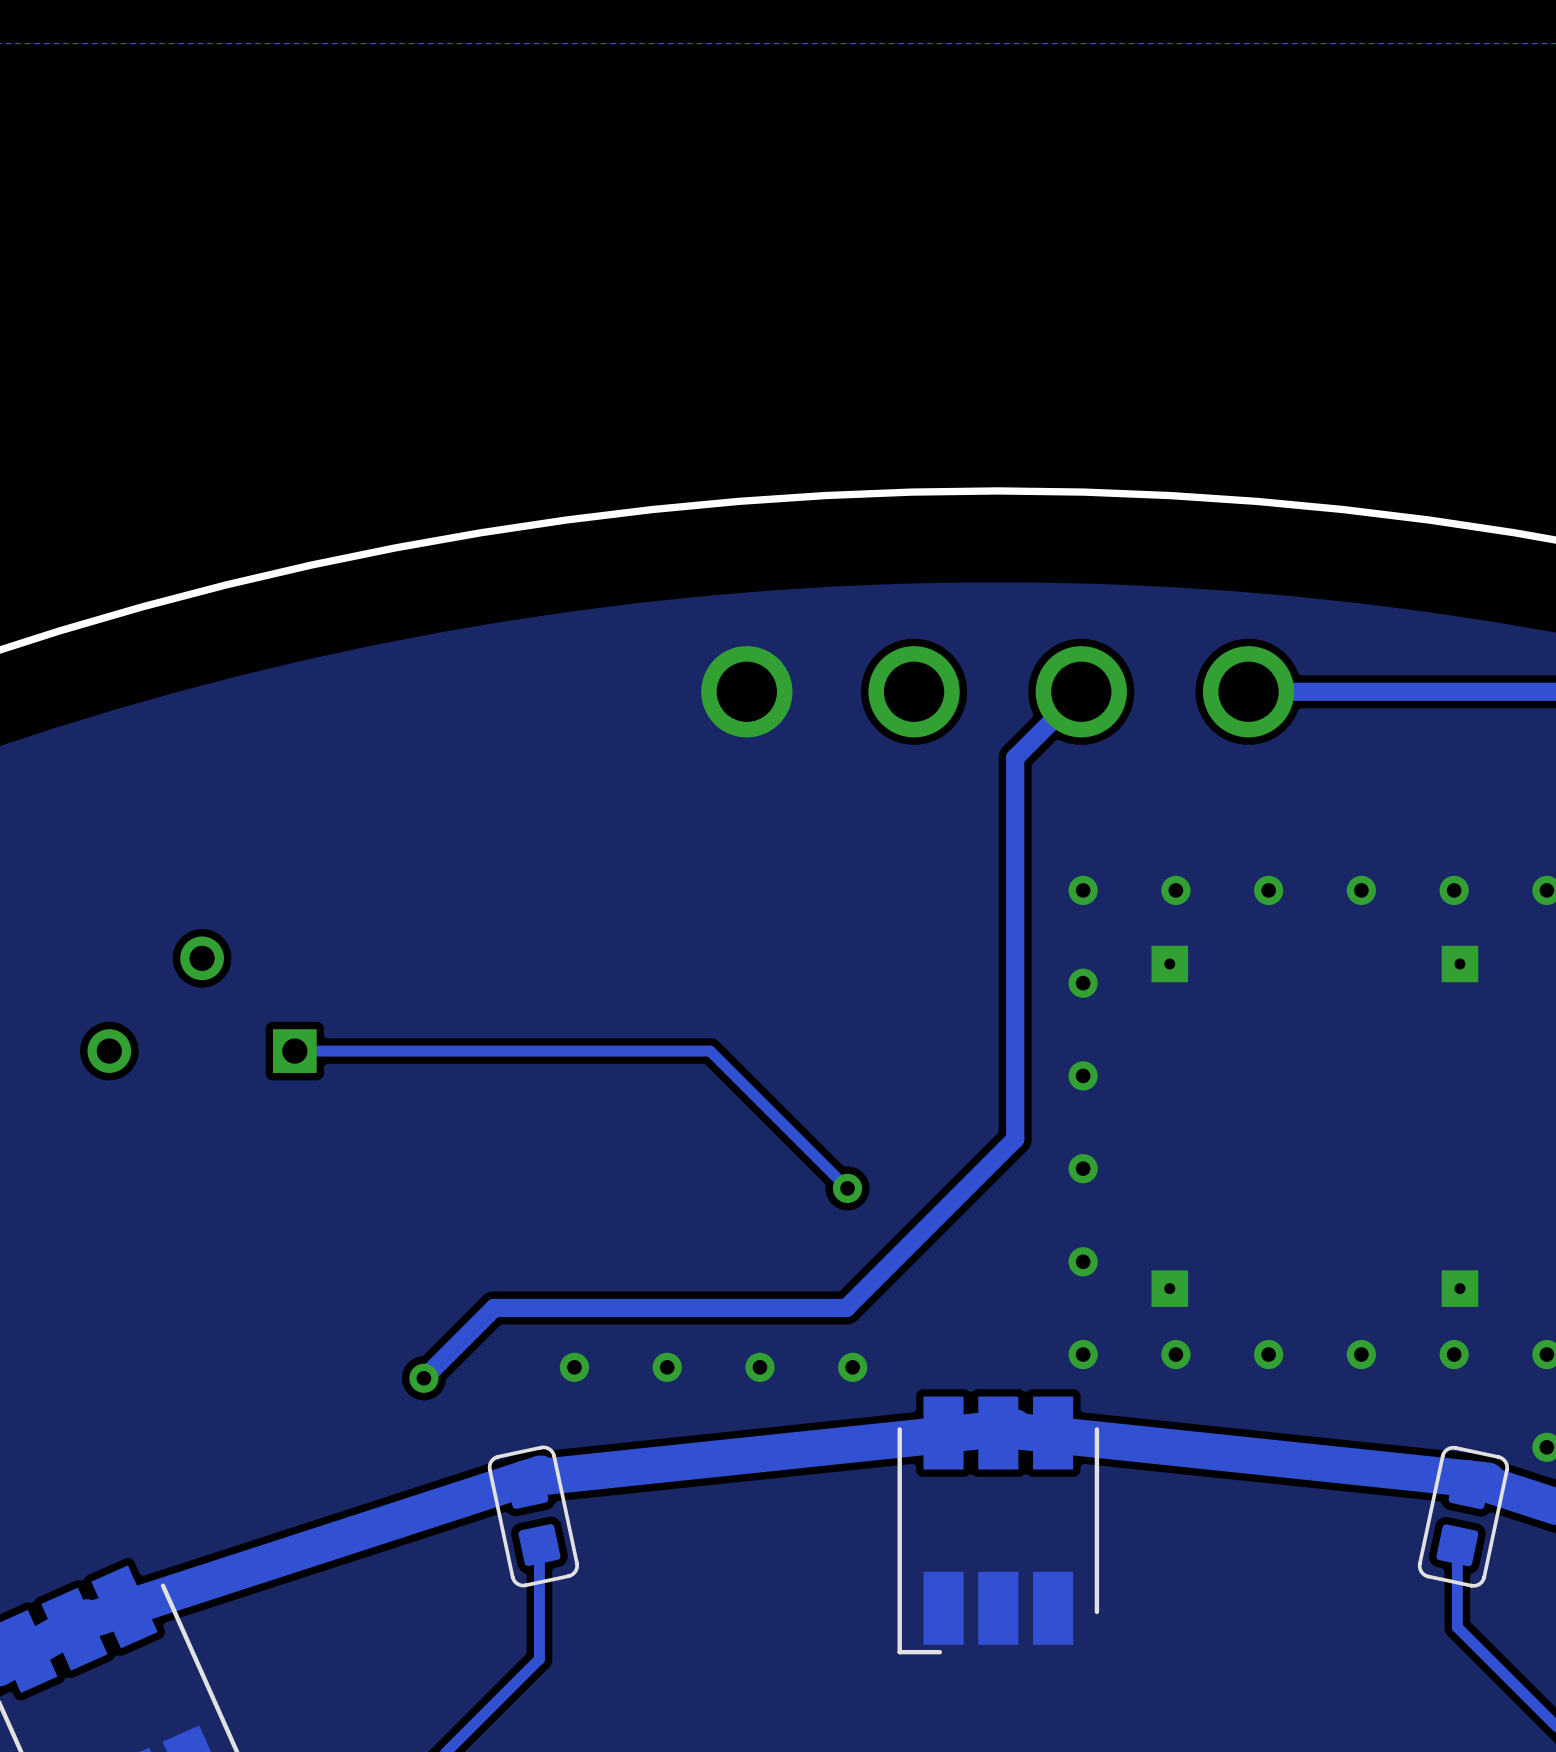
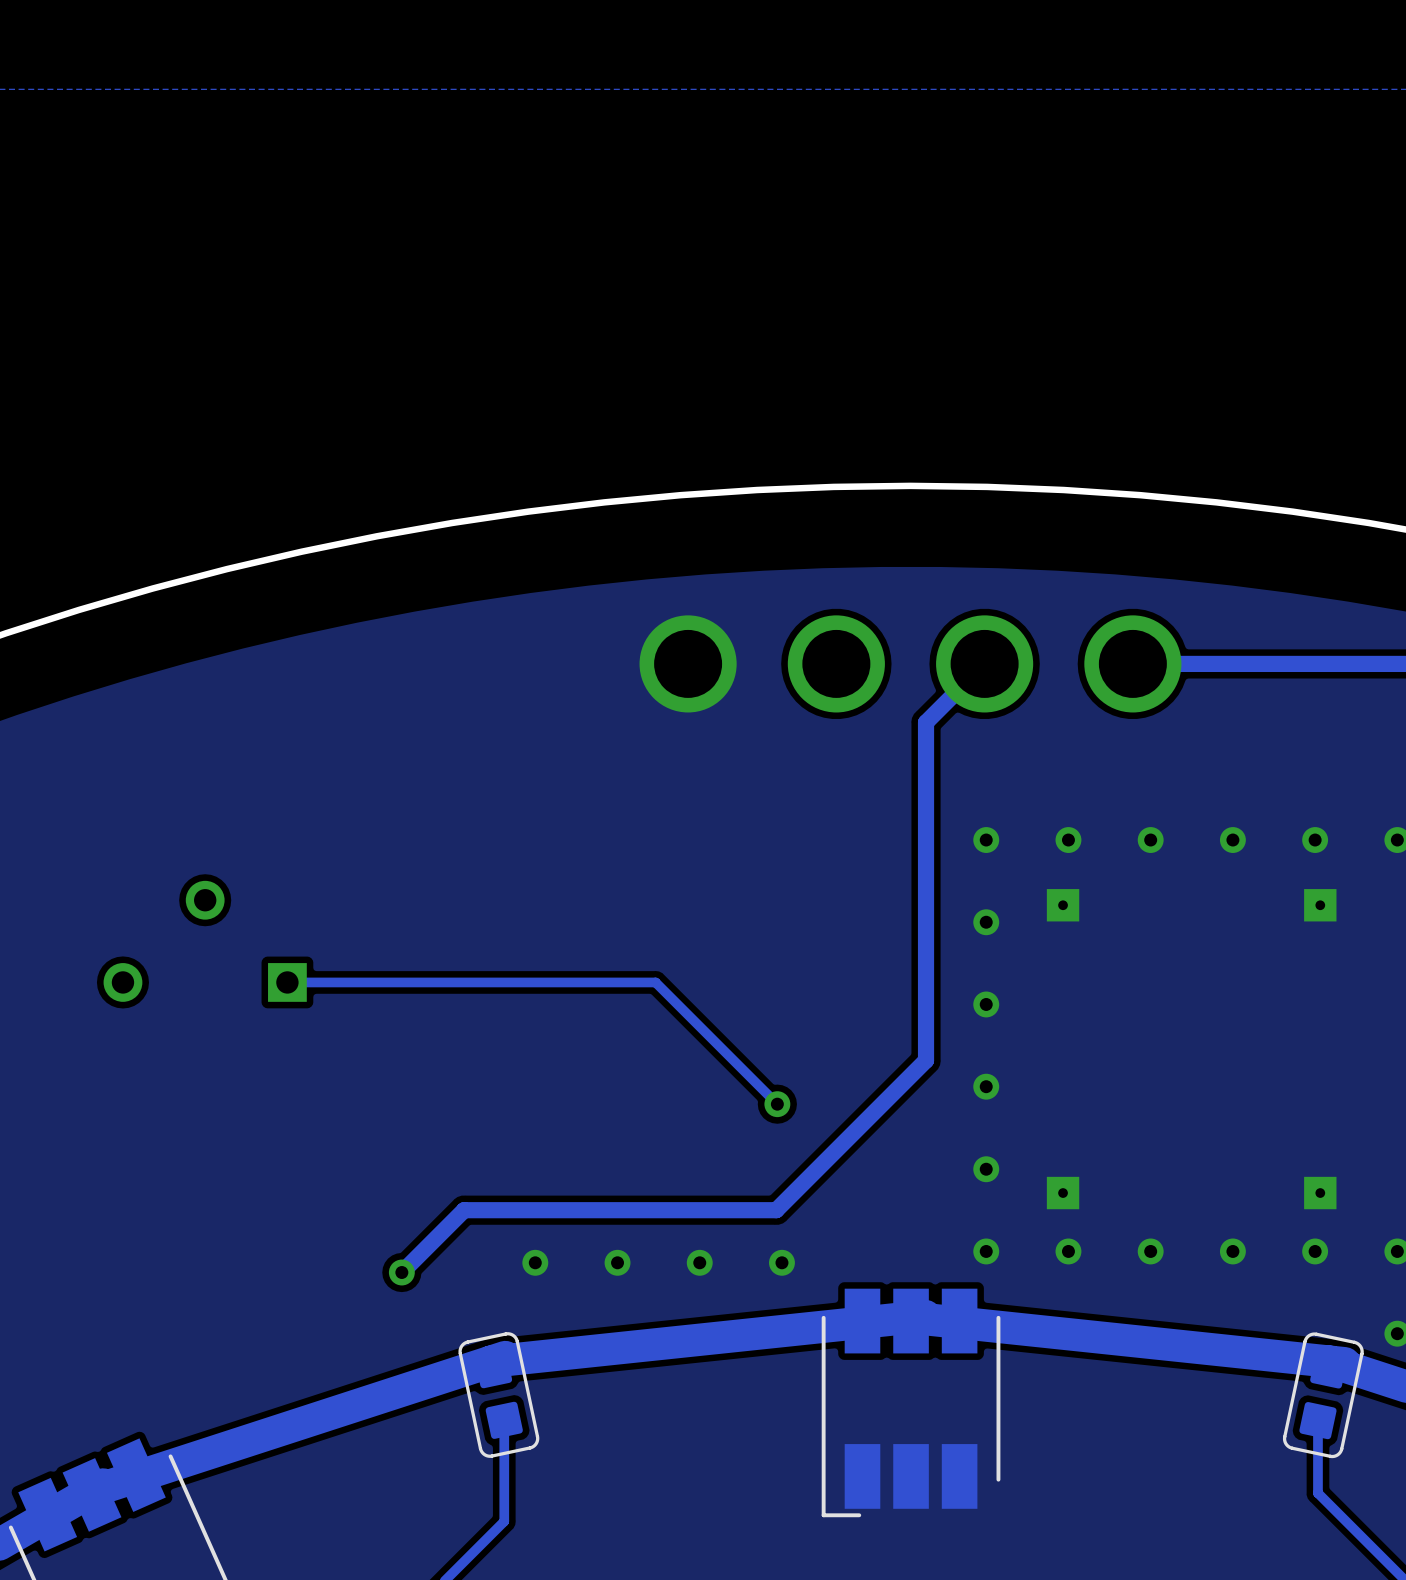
part footprint: [701, 646, 1295, 738] -> [639, 615, 1182, 713]

